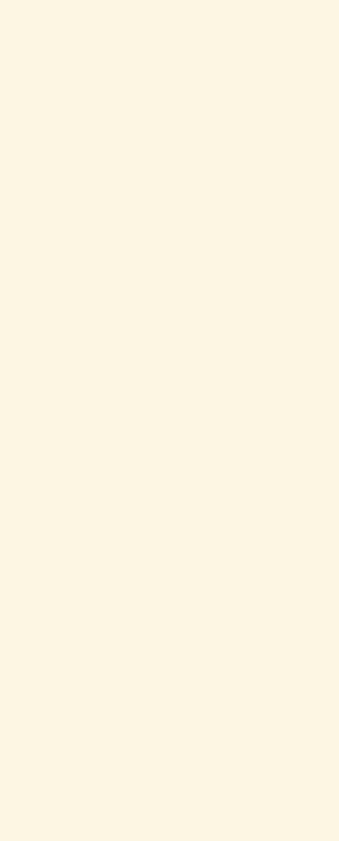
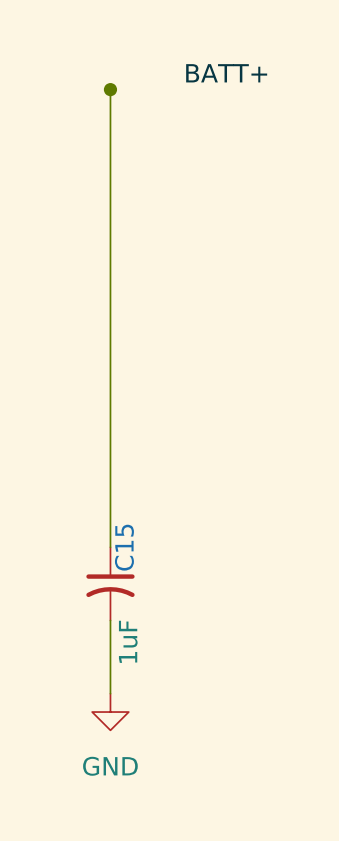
label: none -> BATT+ (226, 73)
wire: none -> (110, 89) (110, 547)
junction: none -> (110, 89)
C15: none -> 1uF (110, 583)
wire: none -> (110, 620) (110, 693)
power symbol: none -> GND (110, 712)

